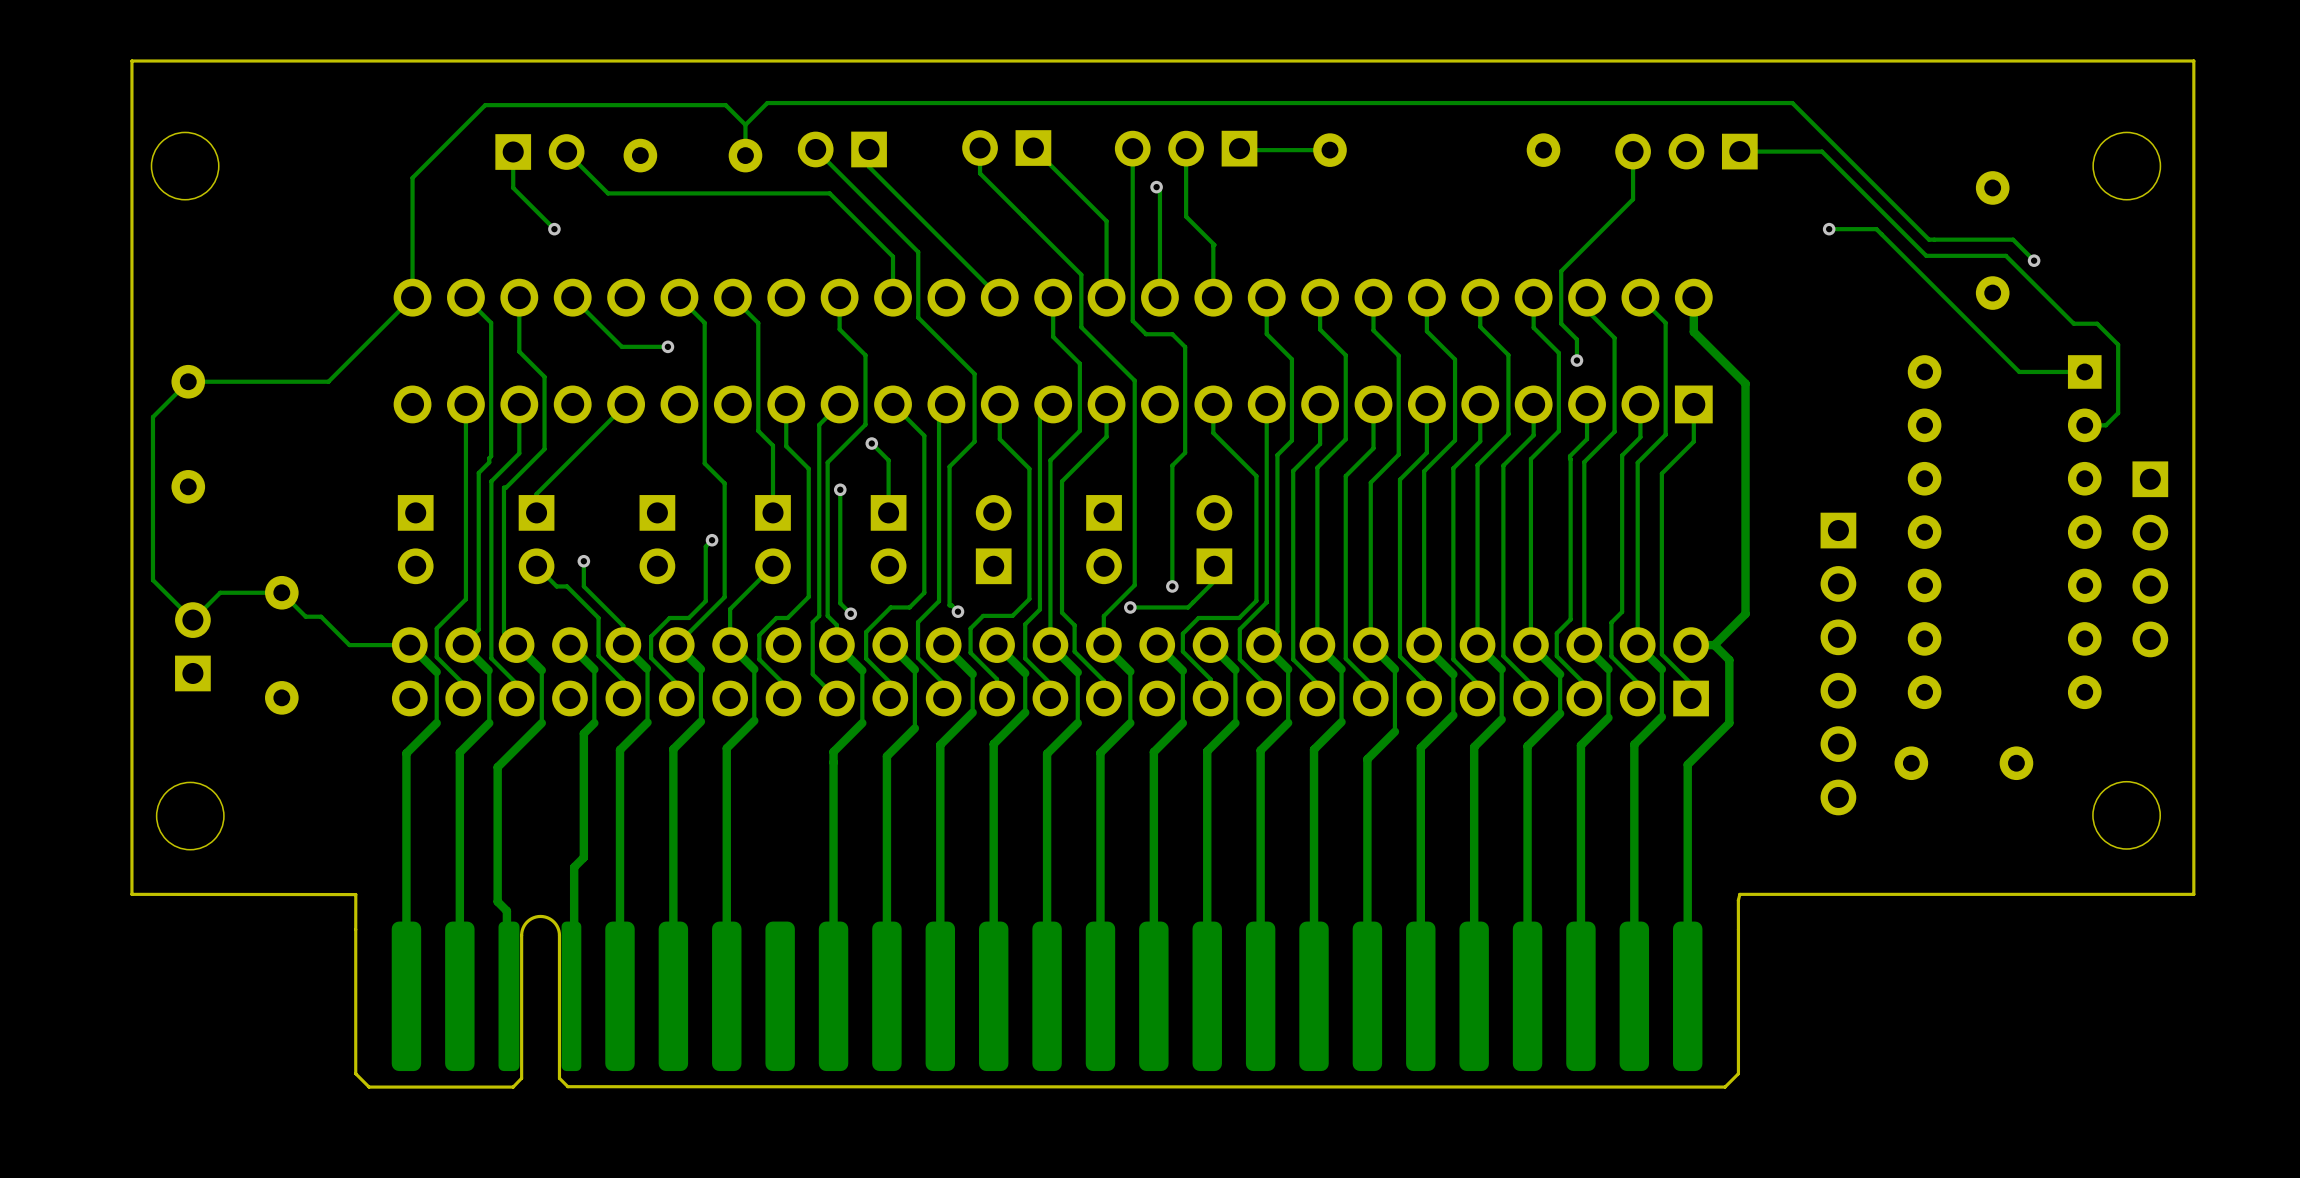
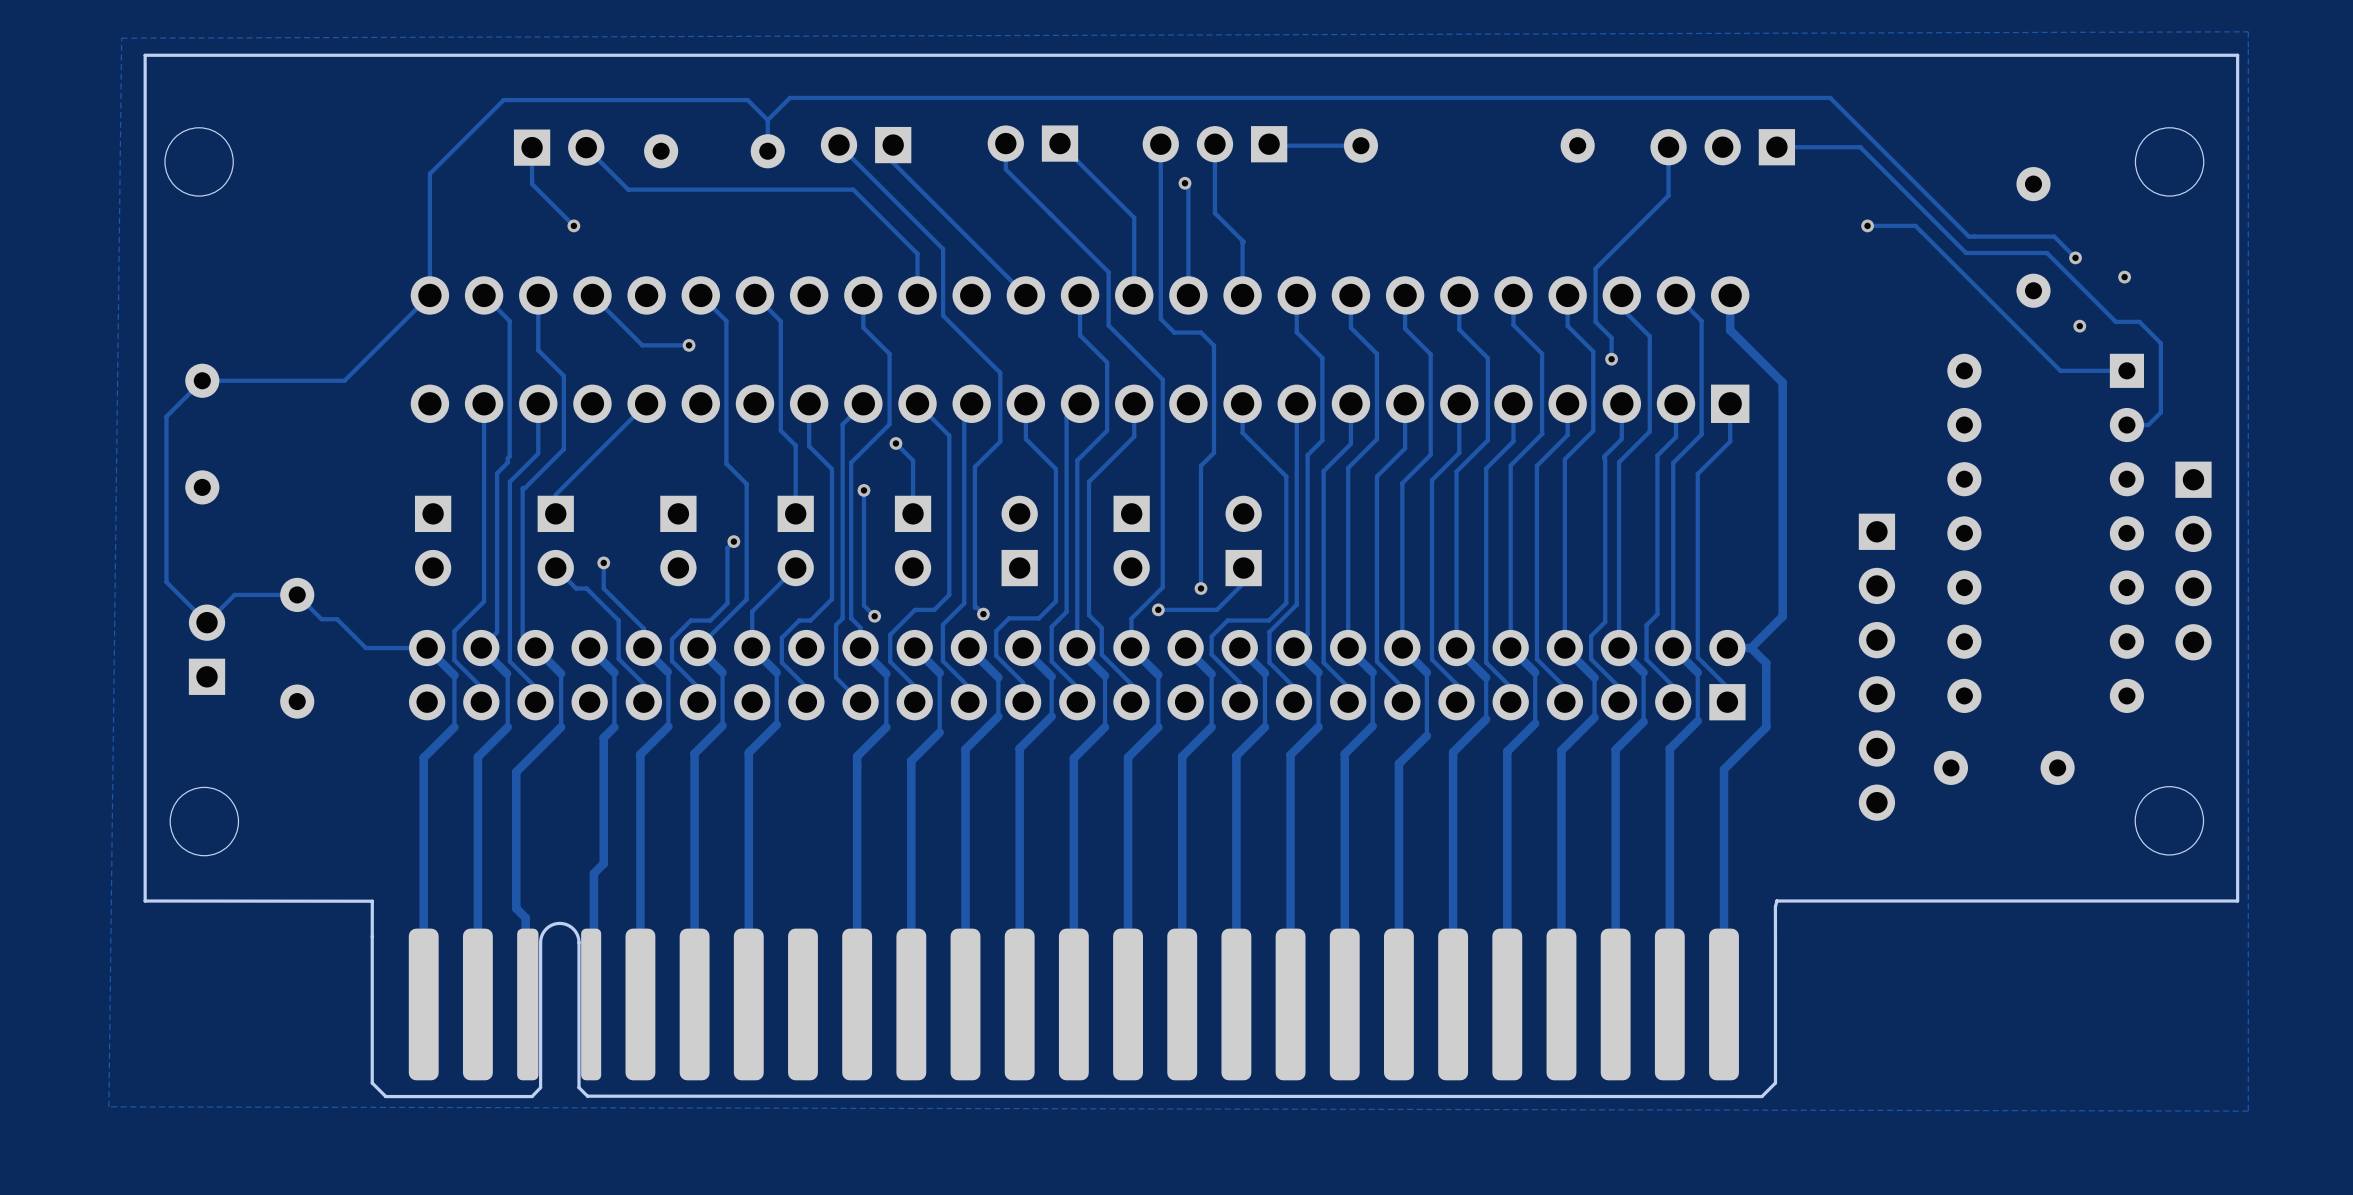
zone outline: none -> (2248, 31) (2248, 1111) (108, 1106) (121, 38) (2248, 31)
via: none -> (2124, 277)
via: none -> (2079, 326)

